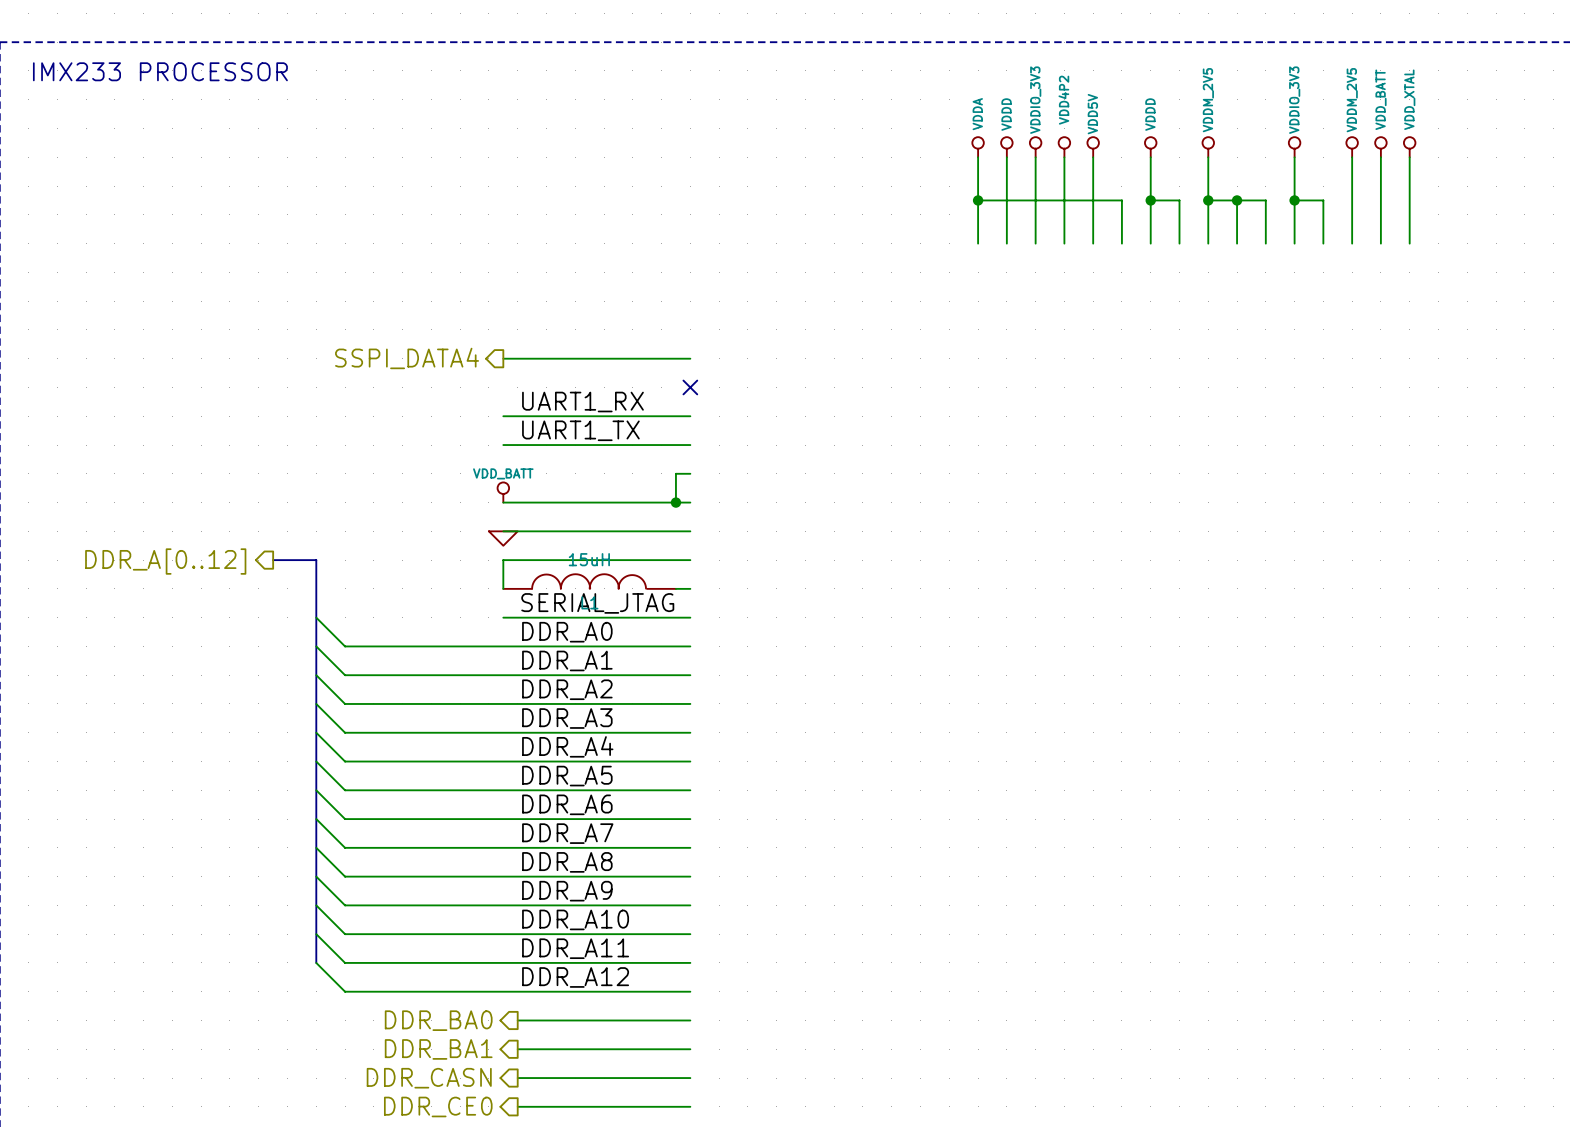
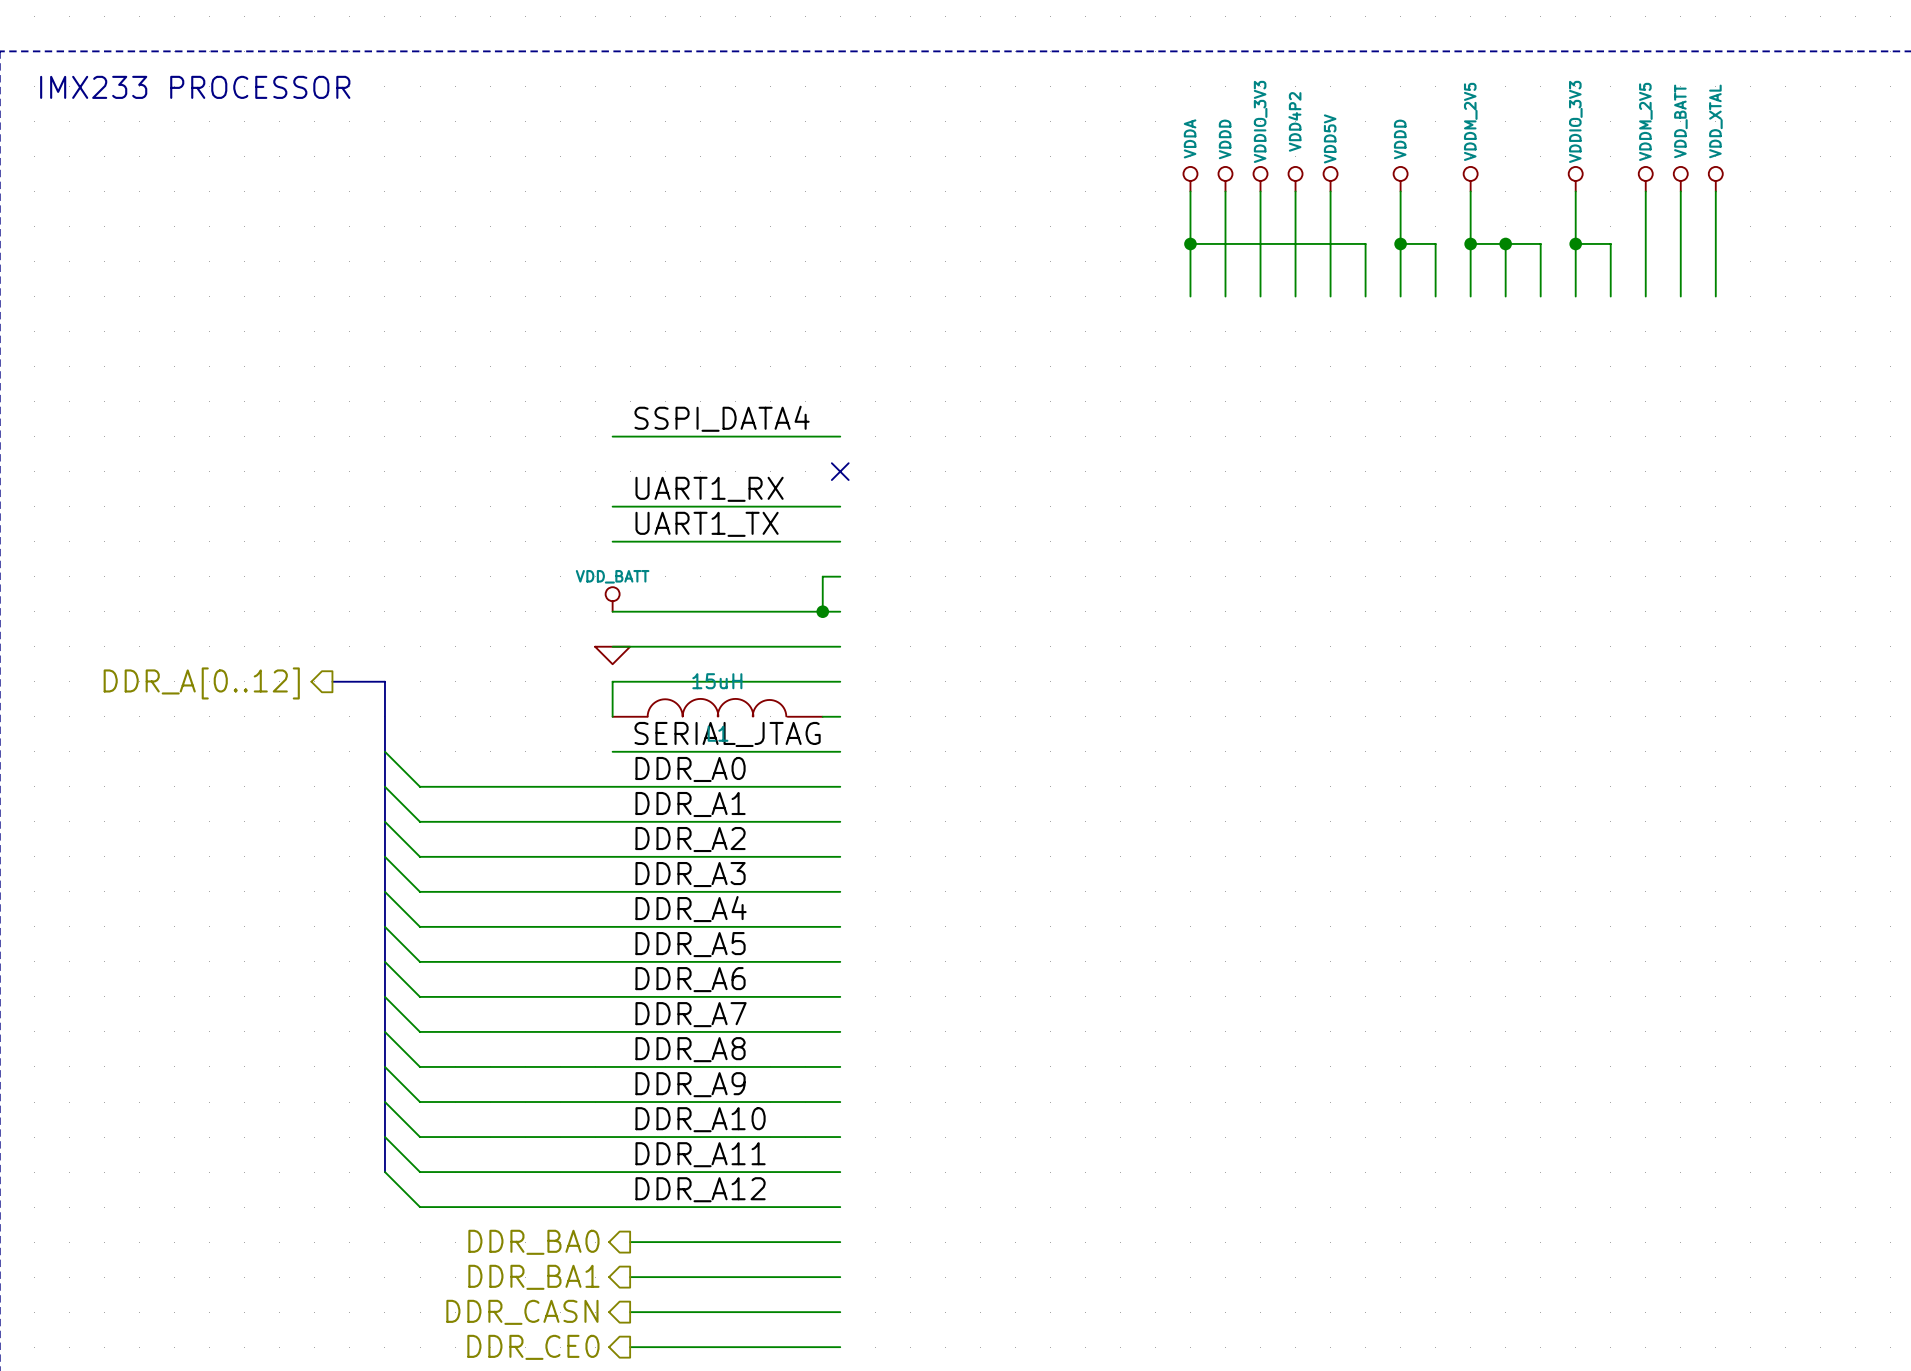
label: none -> SSPI_DATA4 (722, 418)
hierarchical label: SSPI_DATA4 (407, 358) -> none

